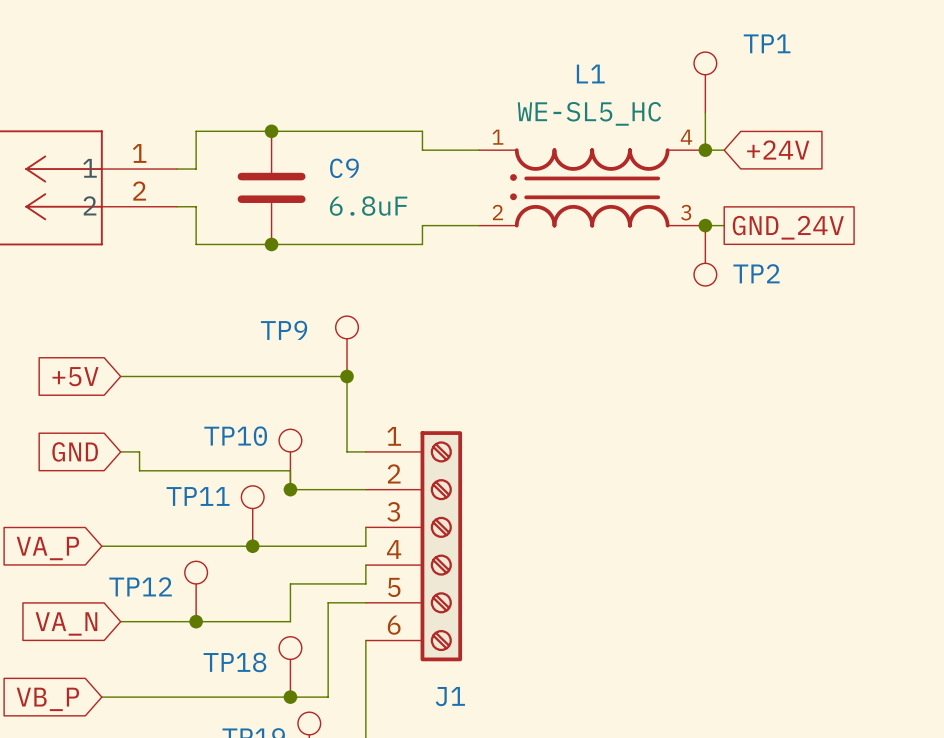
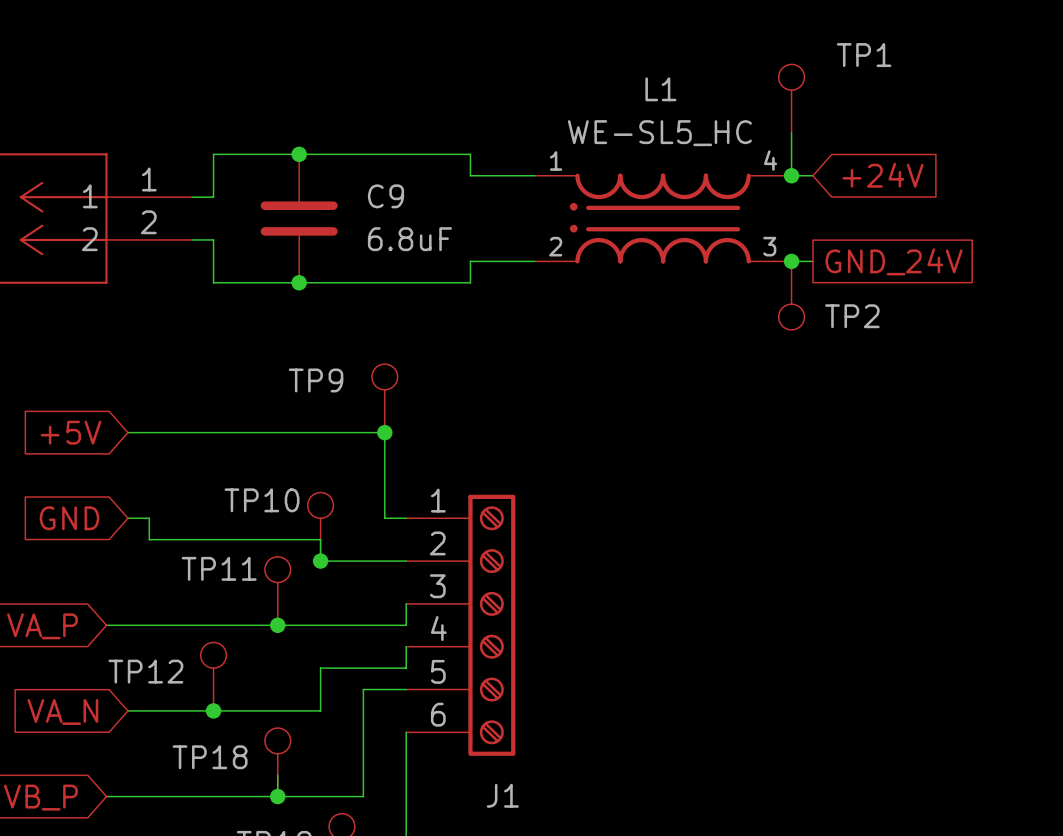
TP18 position: (290, 666) -> (277, 762)
wire: none -> (277, 775) (277, 796)
junction position: (290, 697) -> (277, 796)

